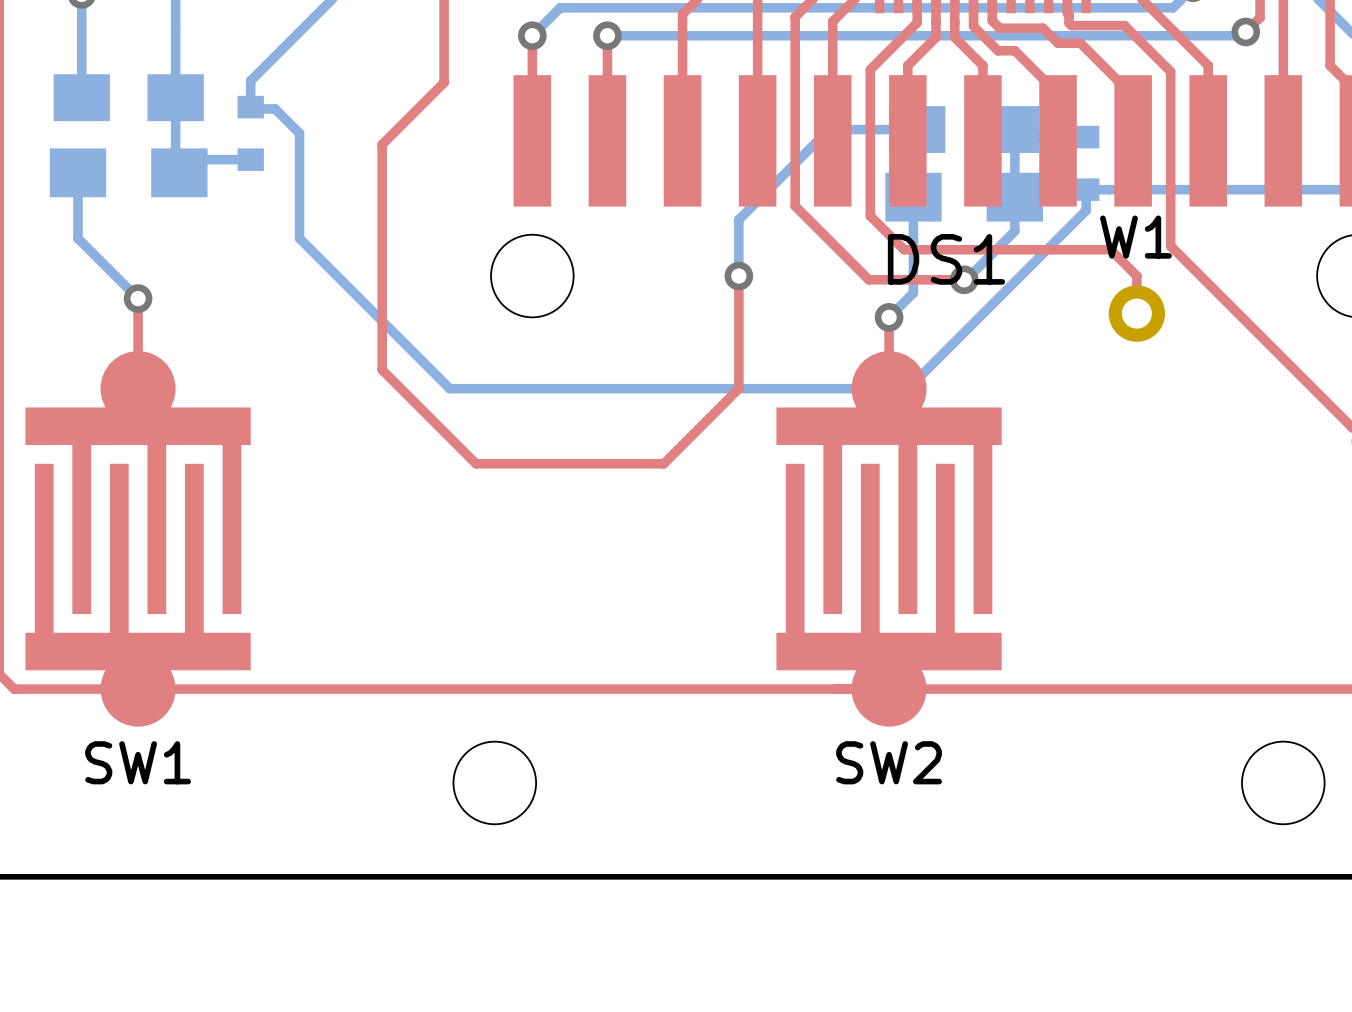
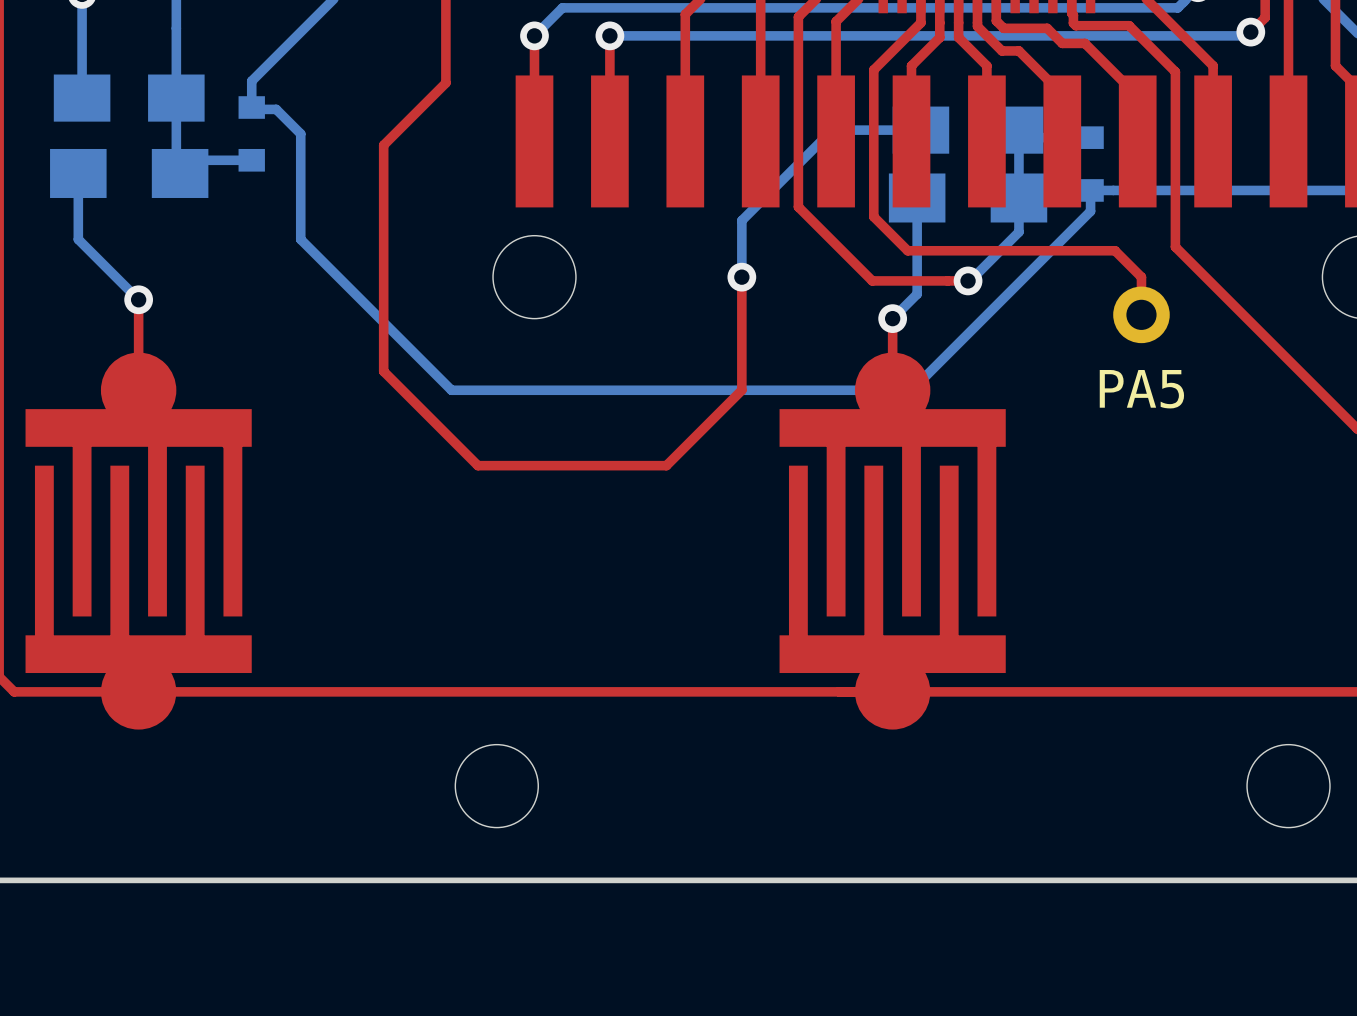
W1 name: W1 (1135, 237) -> PA5 (1141, 389)
DS1 name: DS1 (946, 259) -> none
SW1 name: SW1 (138, 762) -> none
SW2 name: SW2 (889, 762) -> none

